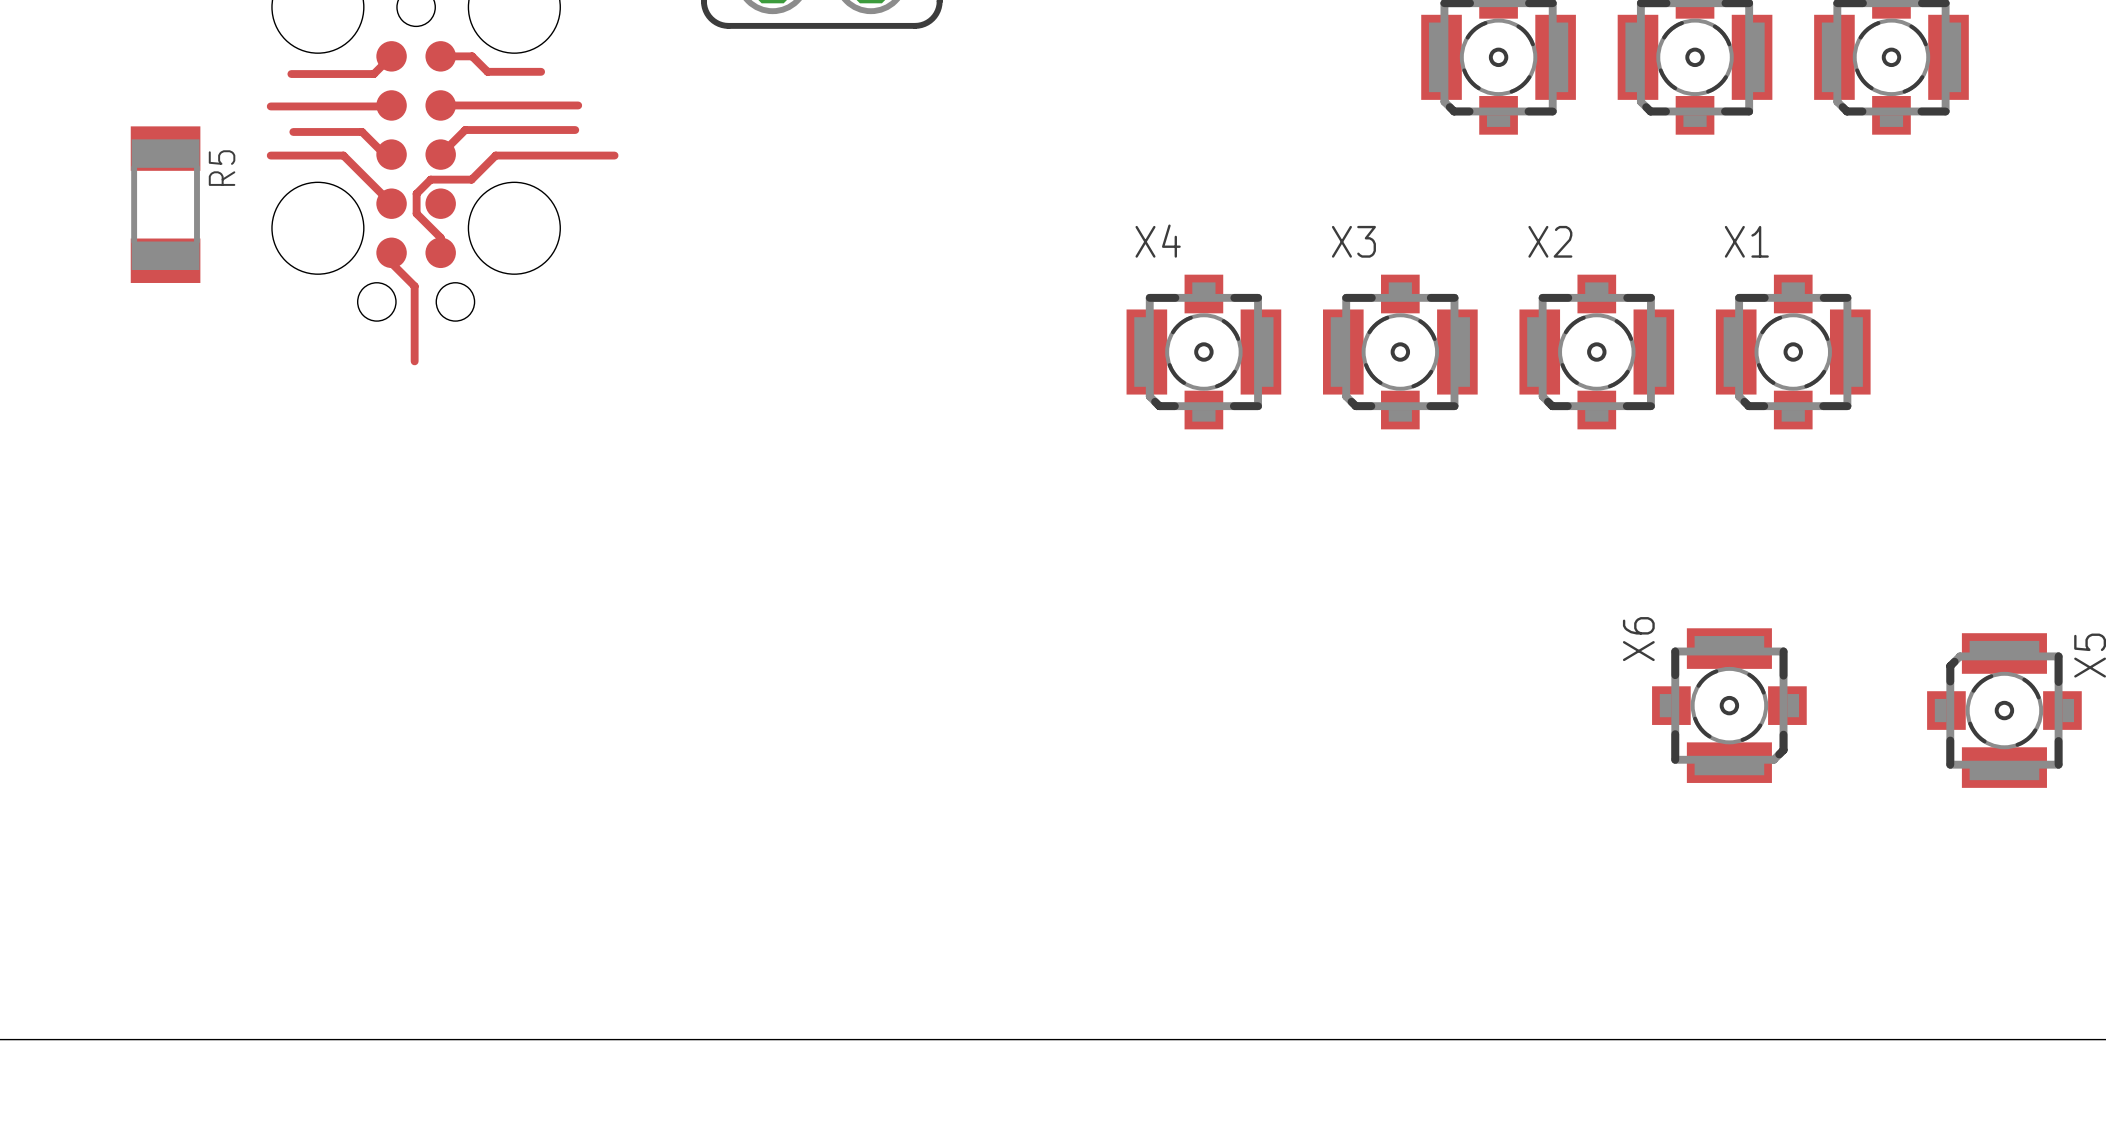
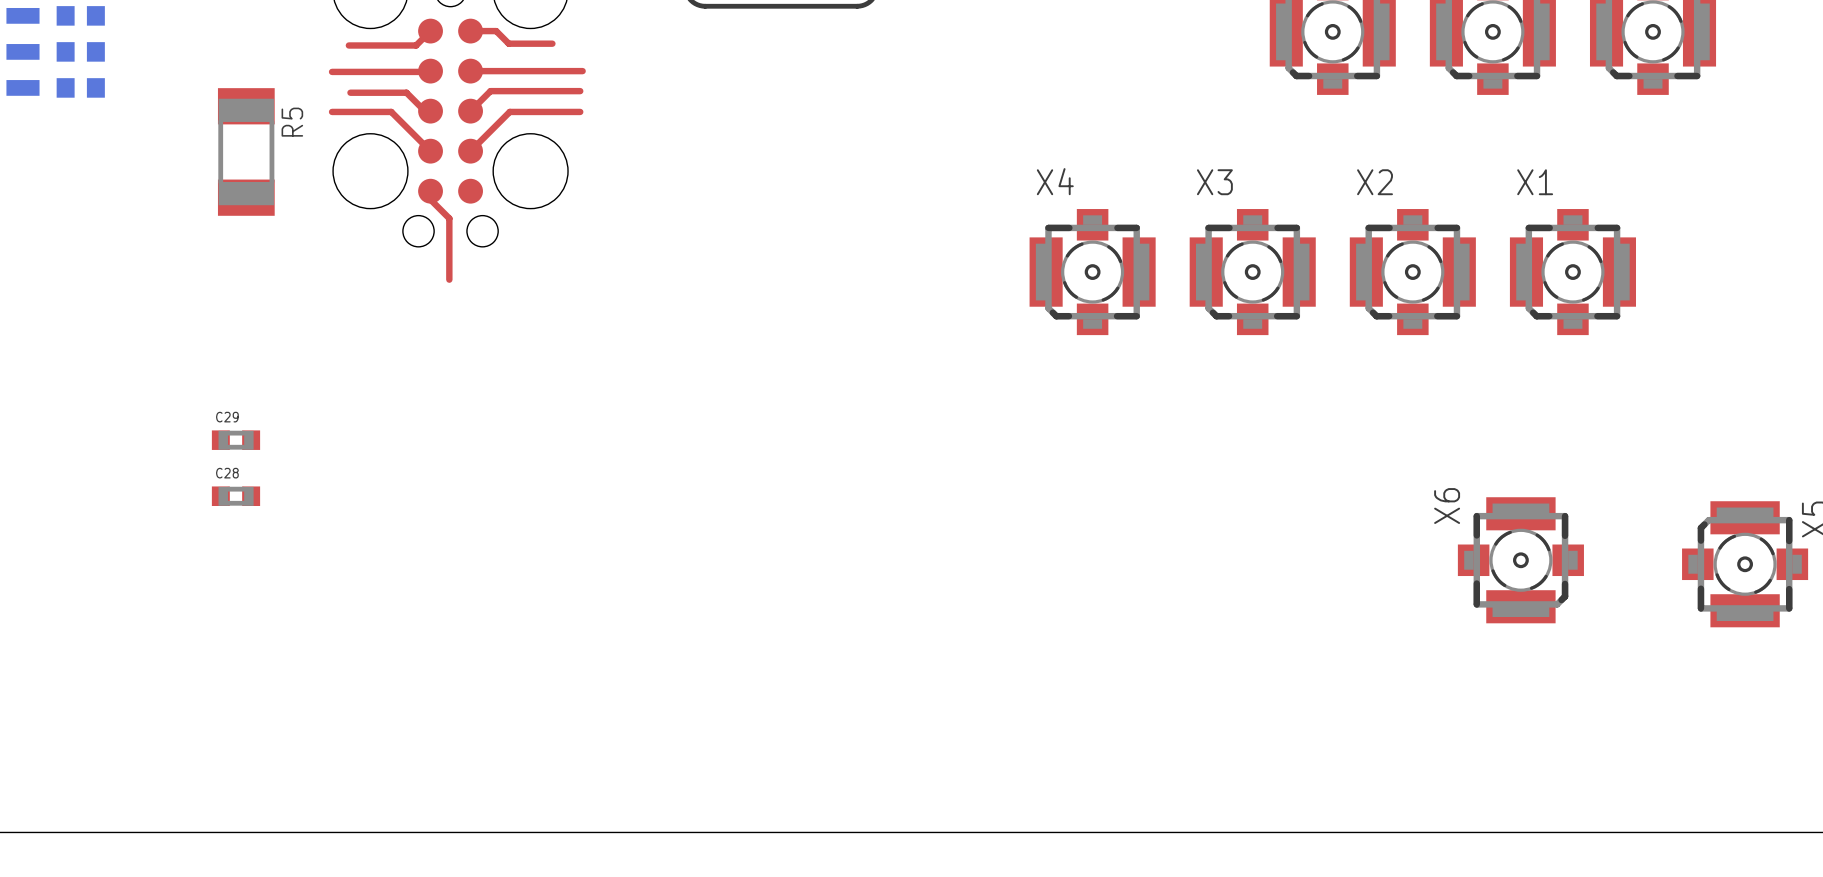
top track: (495, 155) (471, 179) (430, 179) (416, 193) (416, 213) (440, 237) (440, 252) -> (515, 111) (509, 111) (470, 151)
top track: (575, 155) (614, 155) -> none
C29: none -> (235, 440)
C28: none -> (235, 496)

